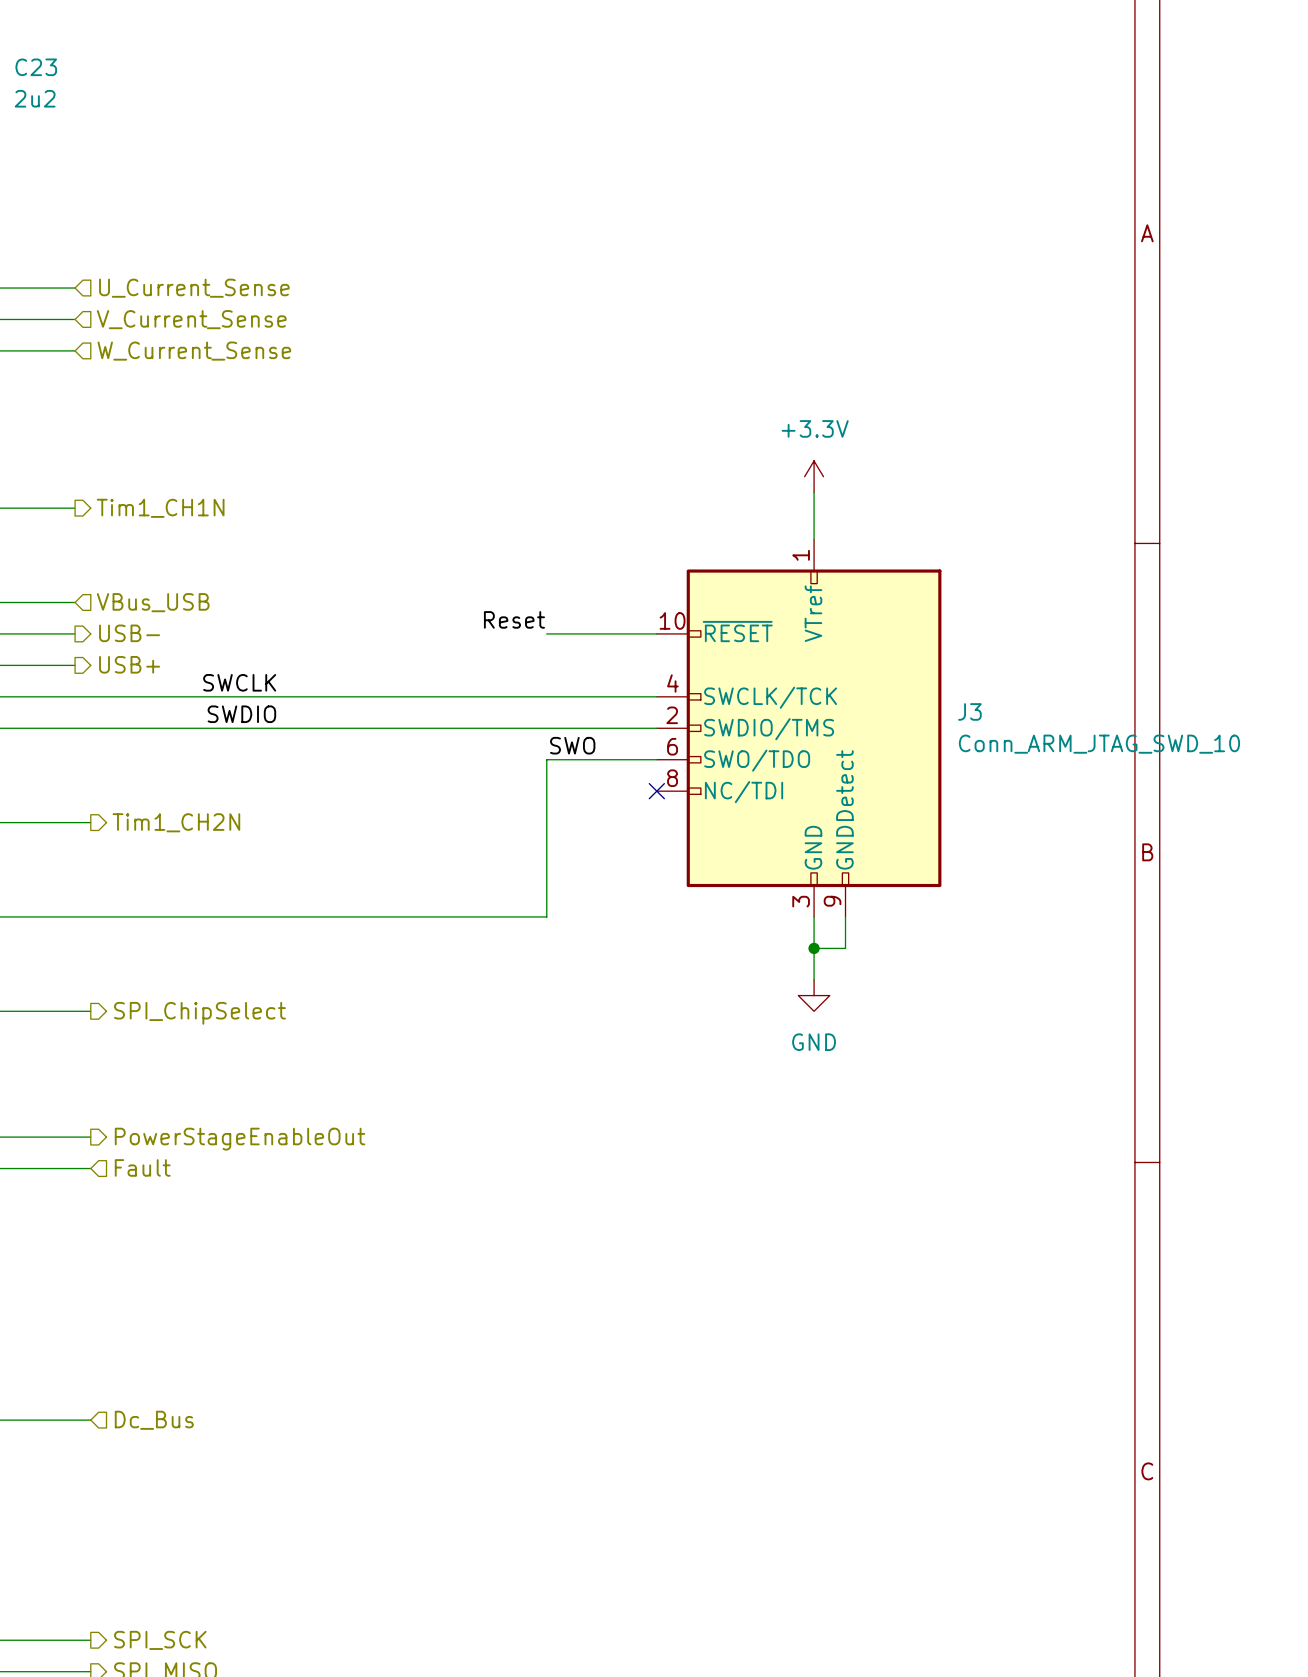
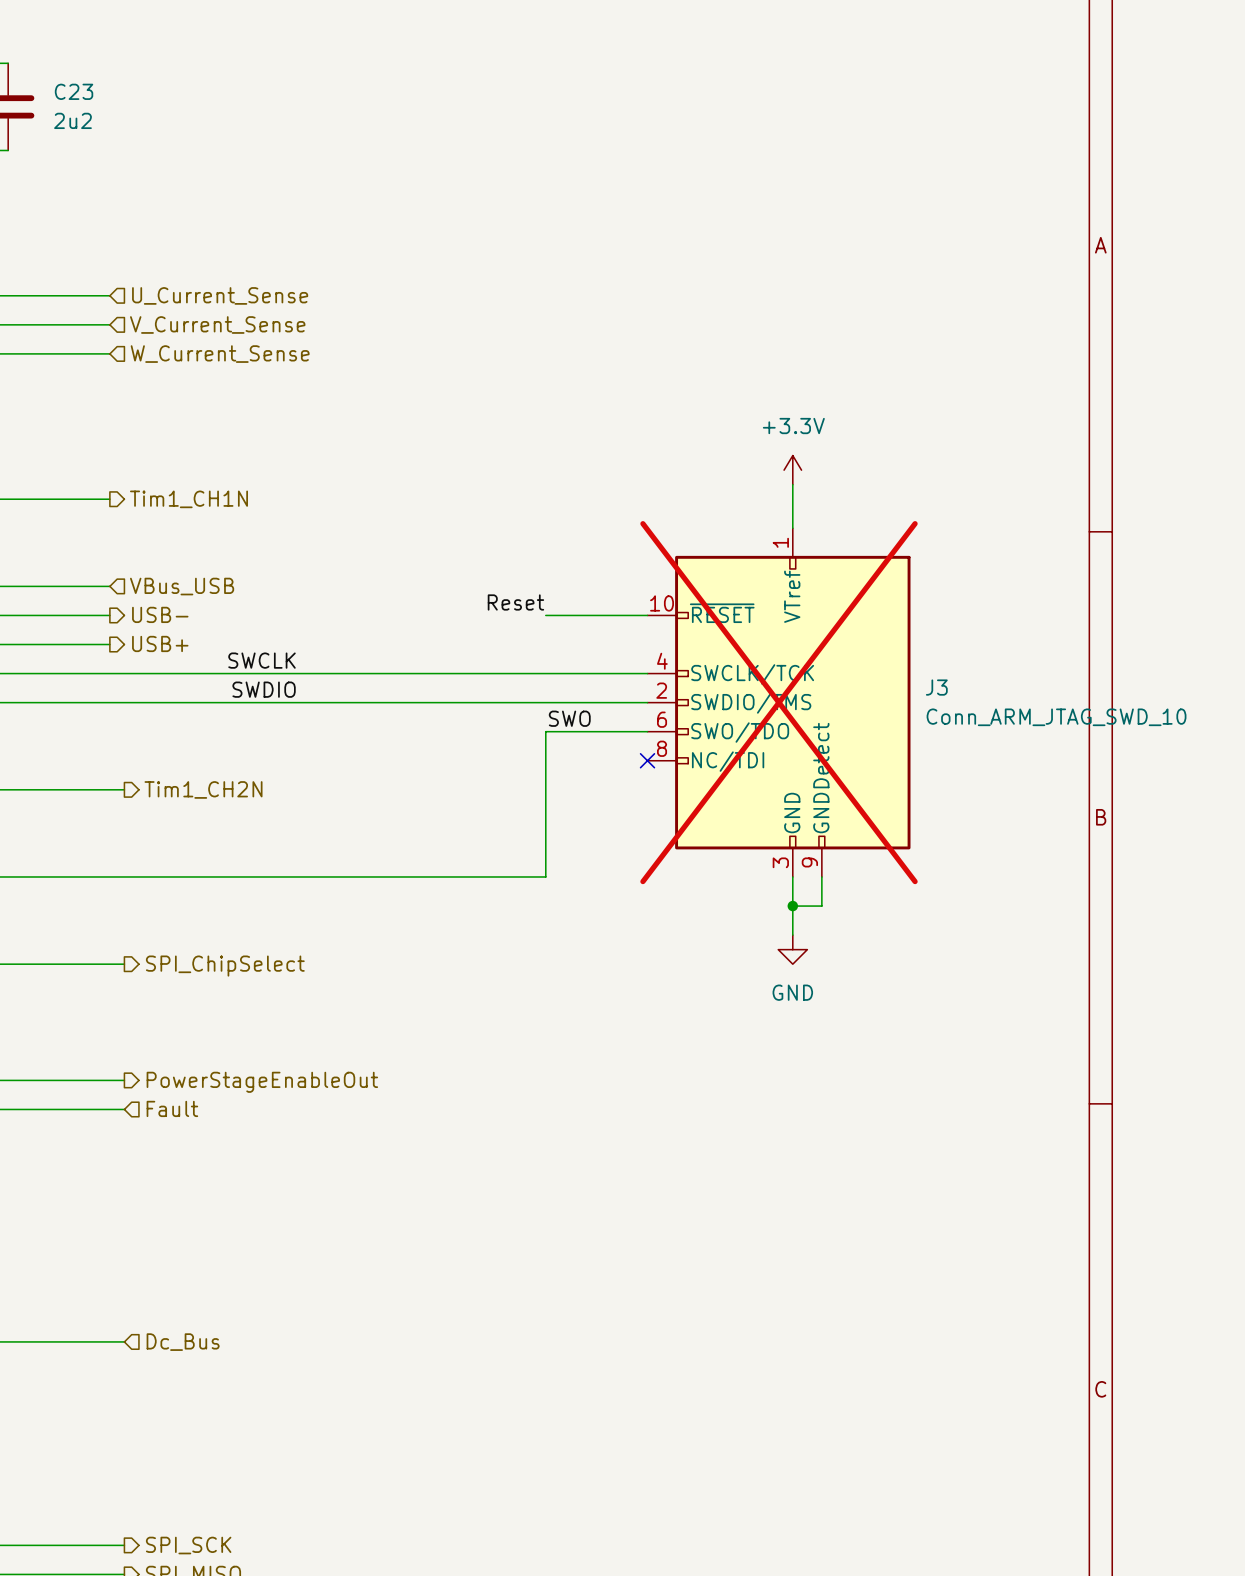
J3 do-not-place cross: none -> (779, 702)

